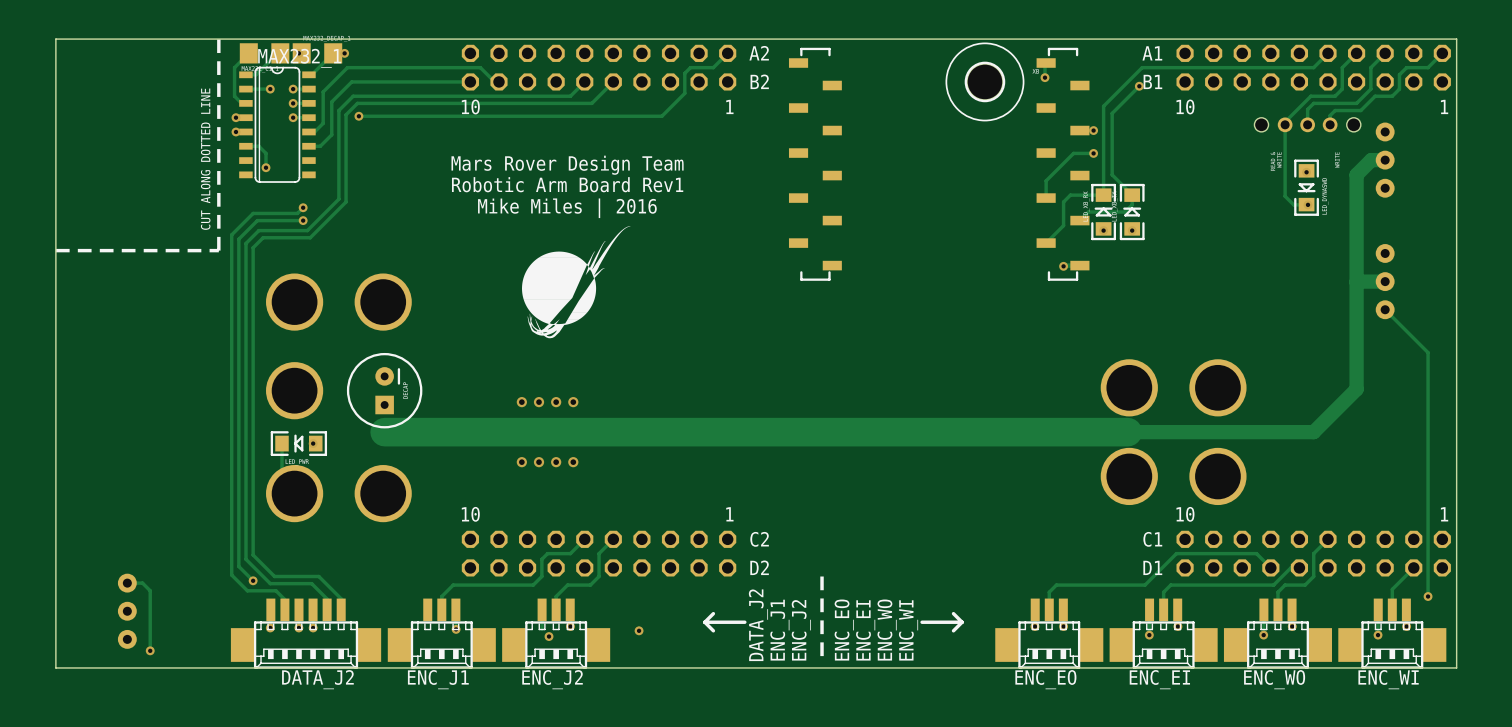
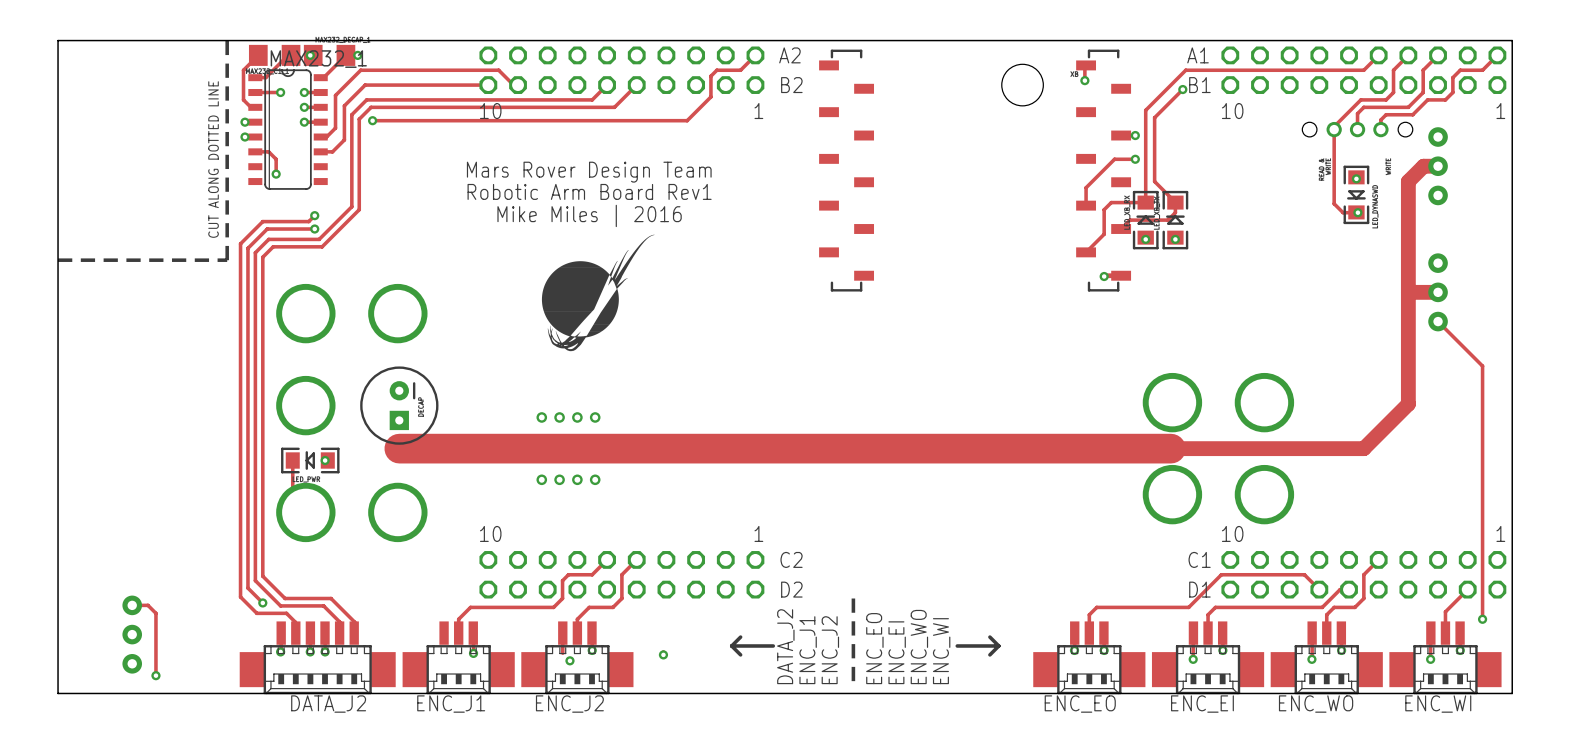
drawing: none -> [1001, 64, 1044, 107]
part: (984, 81) -> none

